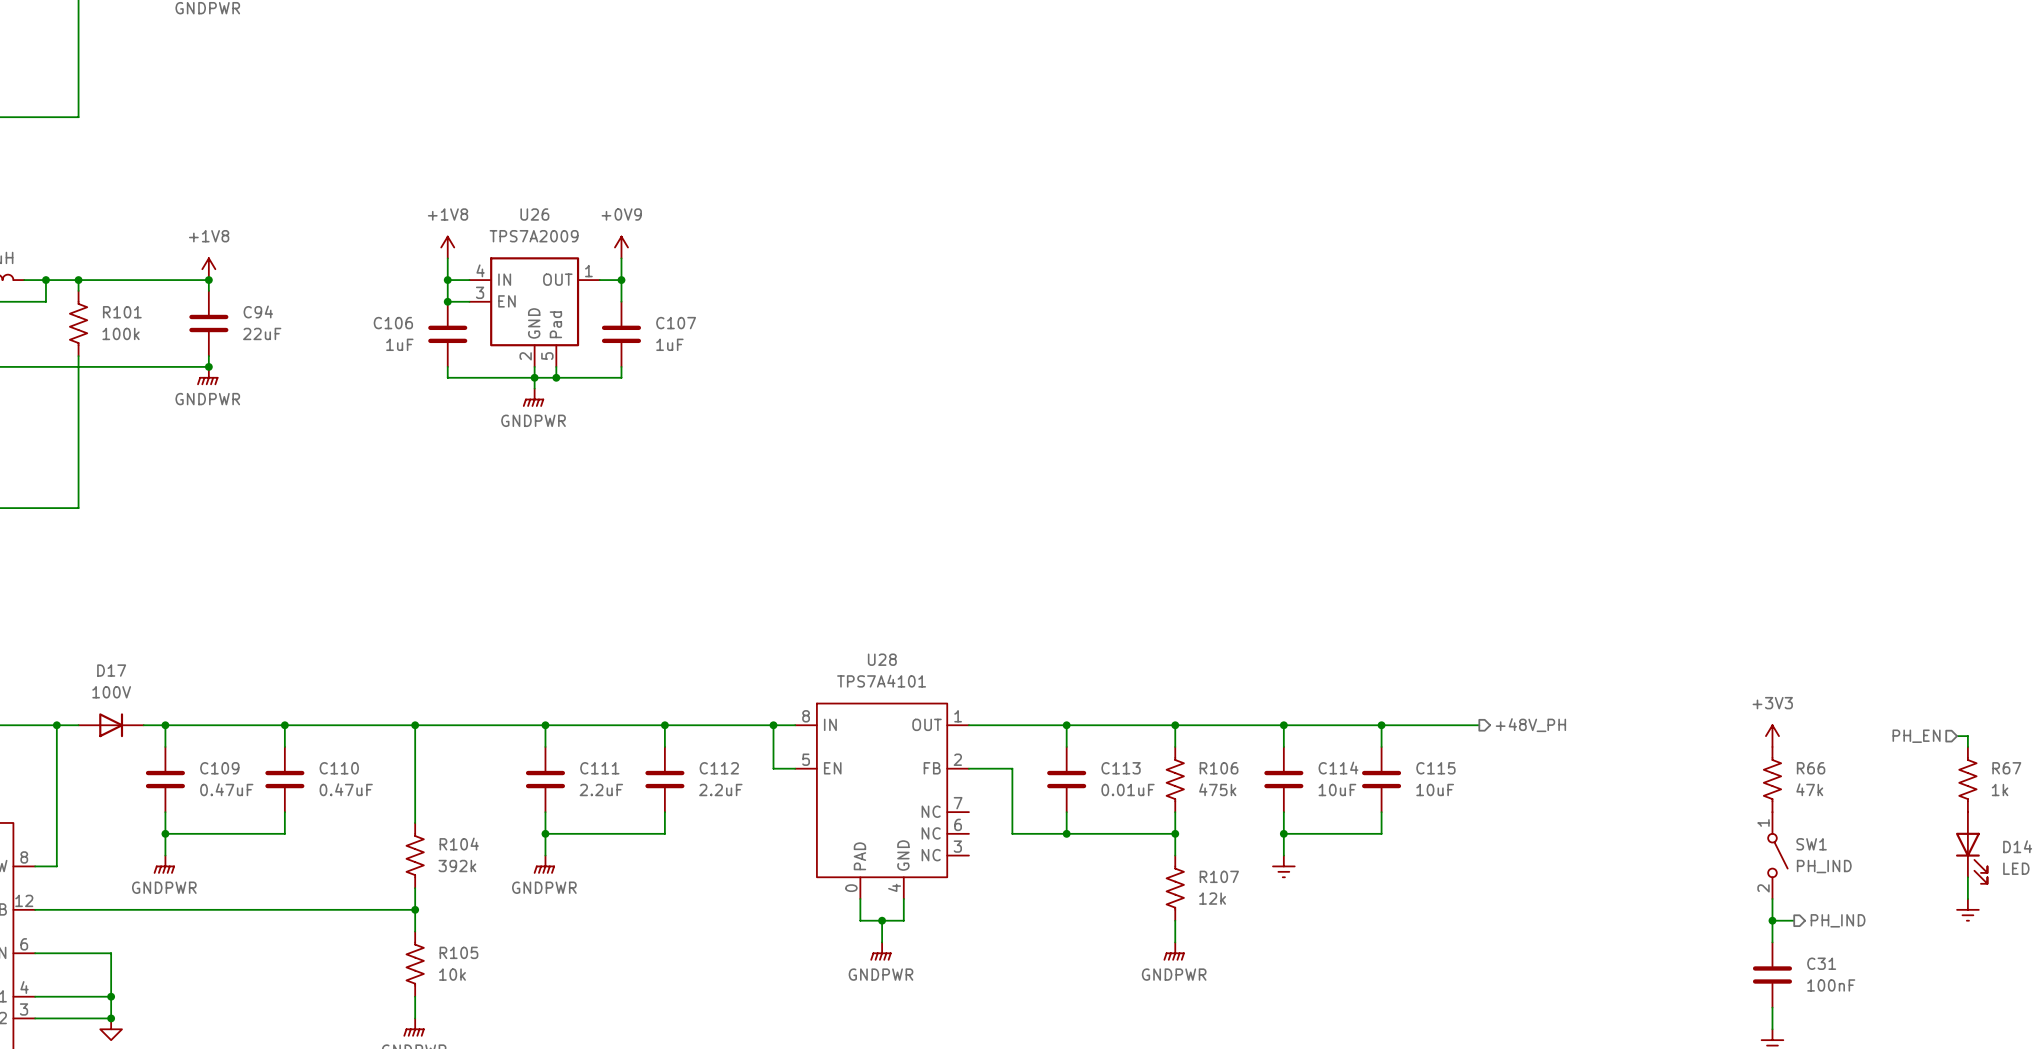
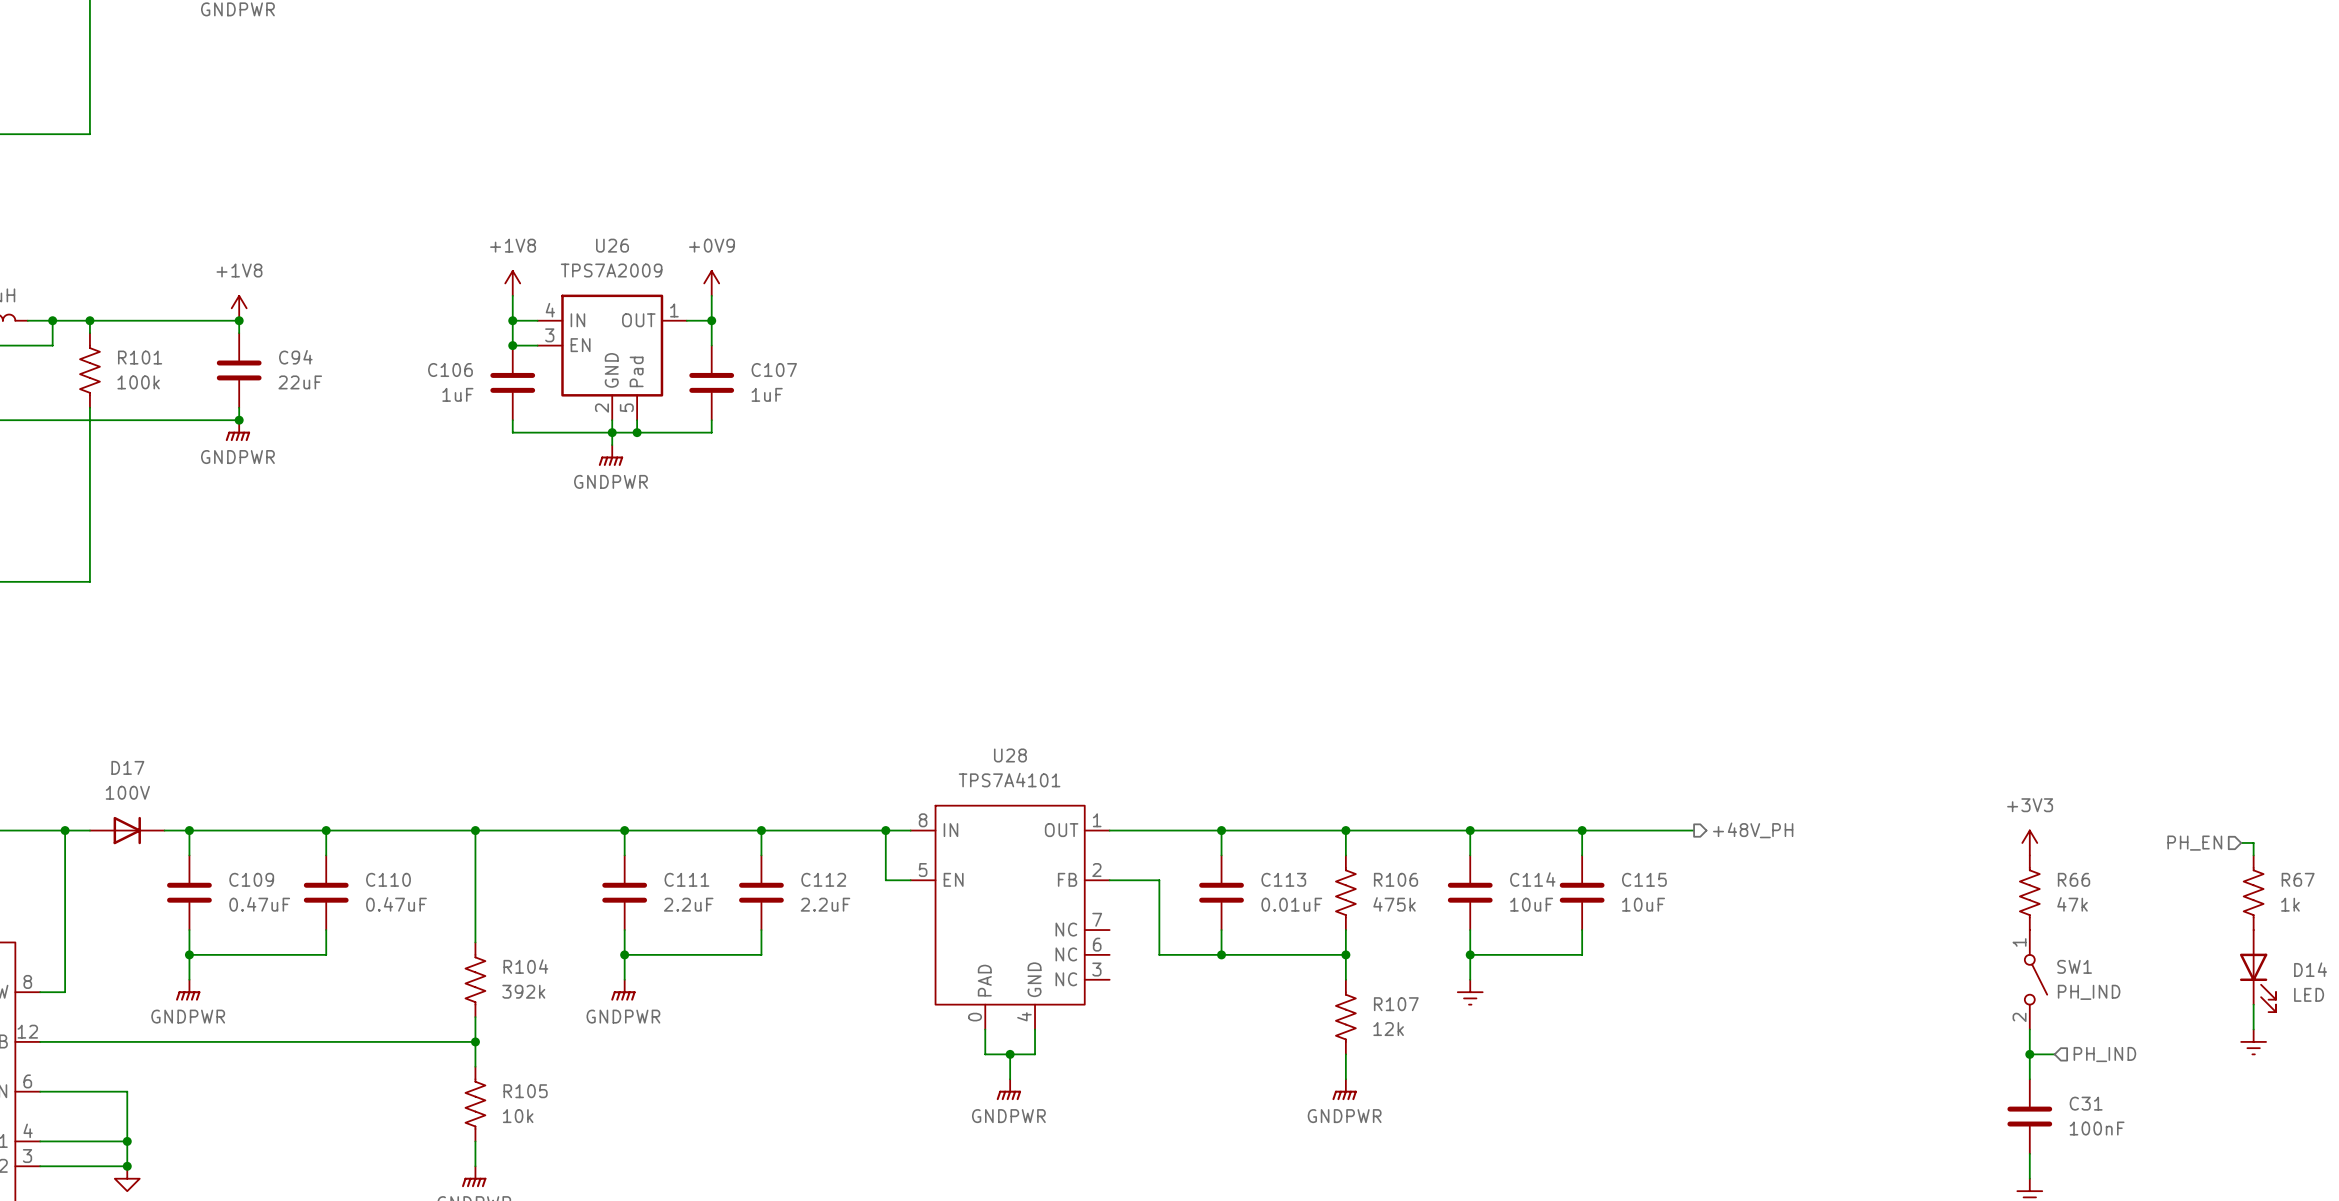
hierarchical label shape: output (1838, 920) -> input (2104, 1054)

